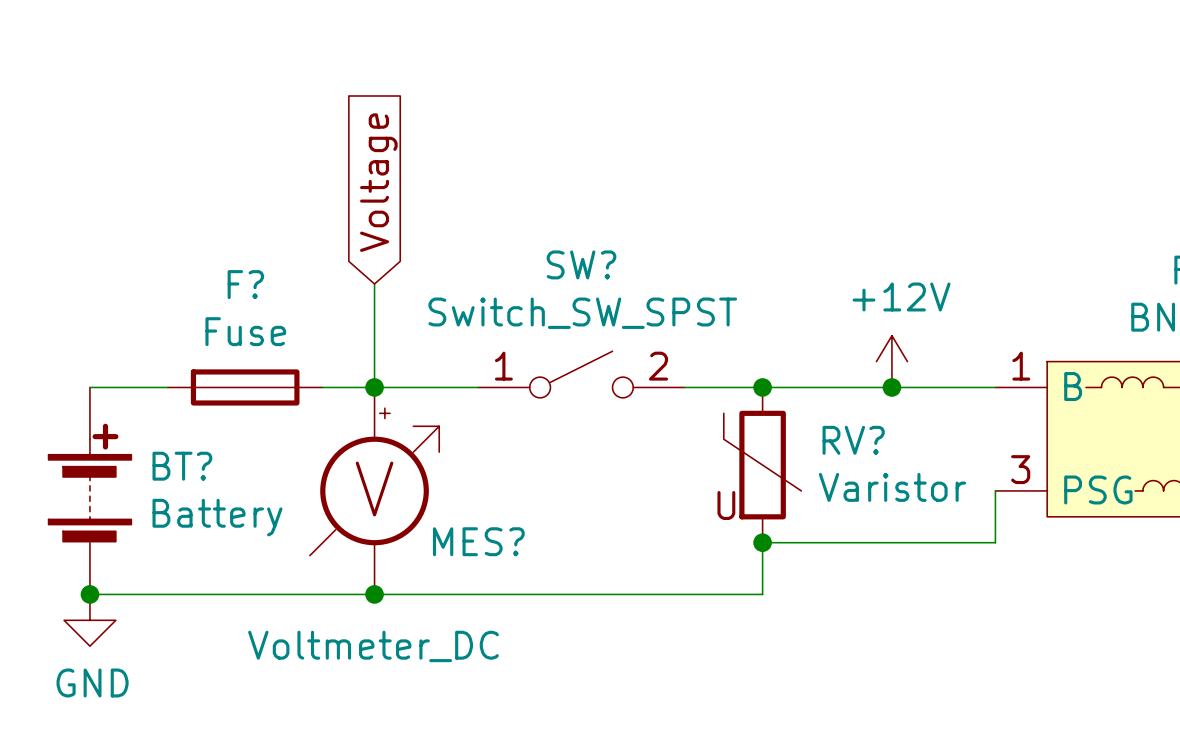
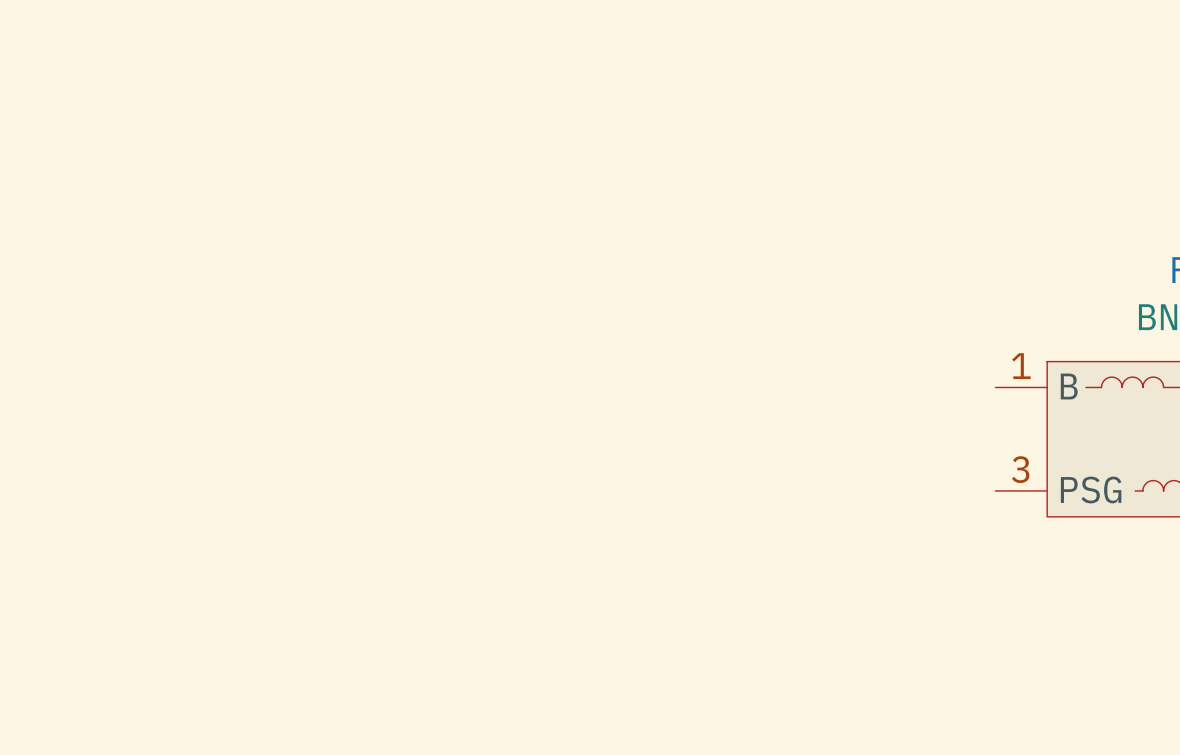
global label: Voltage (378, 182) -> none
wire: (374, 283) (374, 387) -> none
power symbol: +12V (891, 361) -> none
SW?: Switch_SW_SPST (581, 374) -> none
wire: (89, 387) (167, 387) -> none
F?: Fuse (245, 387) -> none
wire: (322, 387) (478, 387) -> none
junction: (374, 387) -> none
wire: (684, 387) (995, 387) -> none
junction: (762, 387) -> none
junction: (891, 387) -> none
RV?: Varistor (762, 465) -> none
BT?: Battery (89, 490) -> none
MES?: Voltmeter_DC (374, 490) -> none
wire: (995, 490) (995, 542) (762, 542) (762, 594) (89, 594) -> none
junction: (762, 542) -> none
junction: (89, 594) -> none
junction: (374, 594) -> none
power symbol: GND (89, 620) -> none

